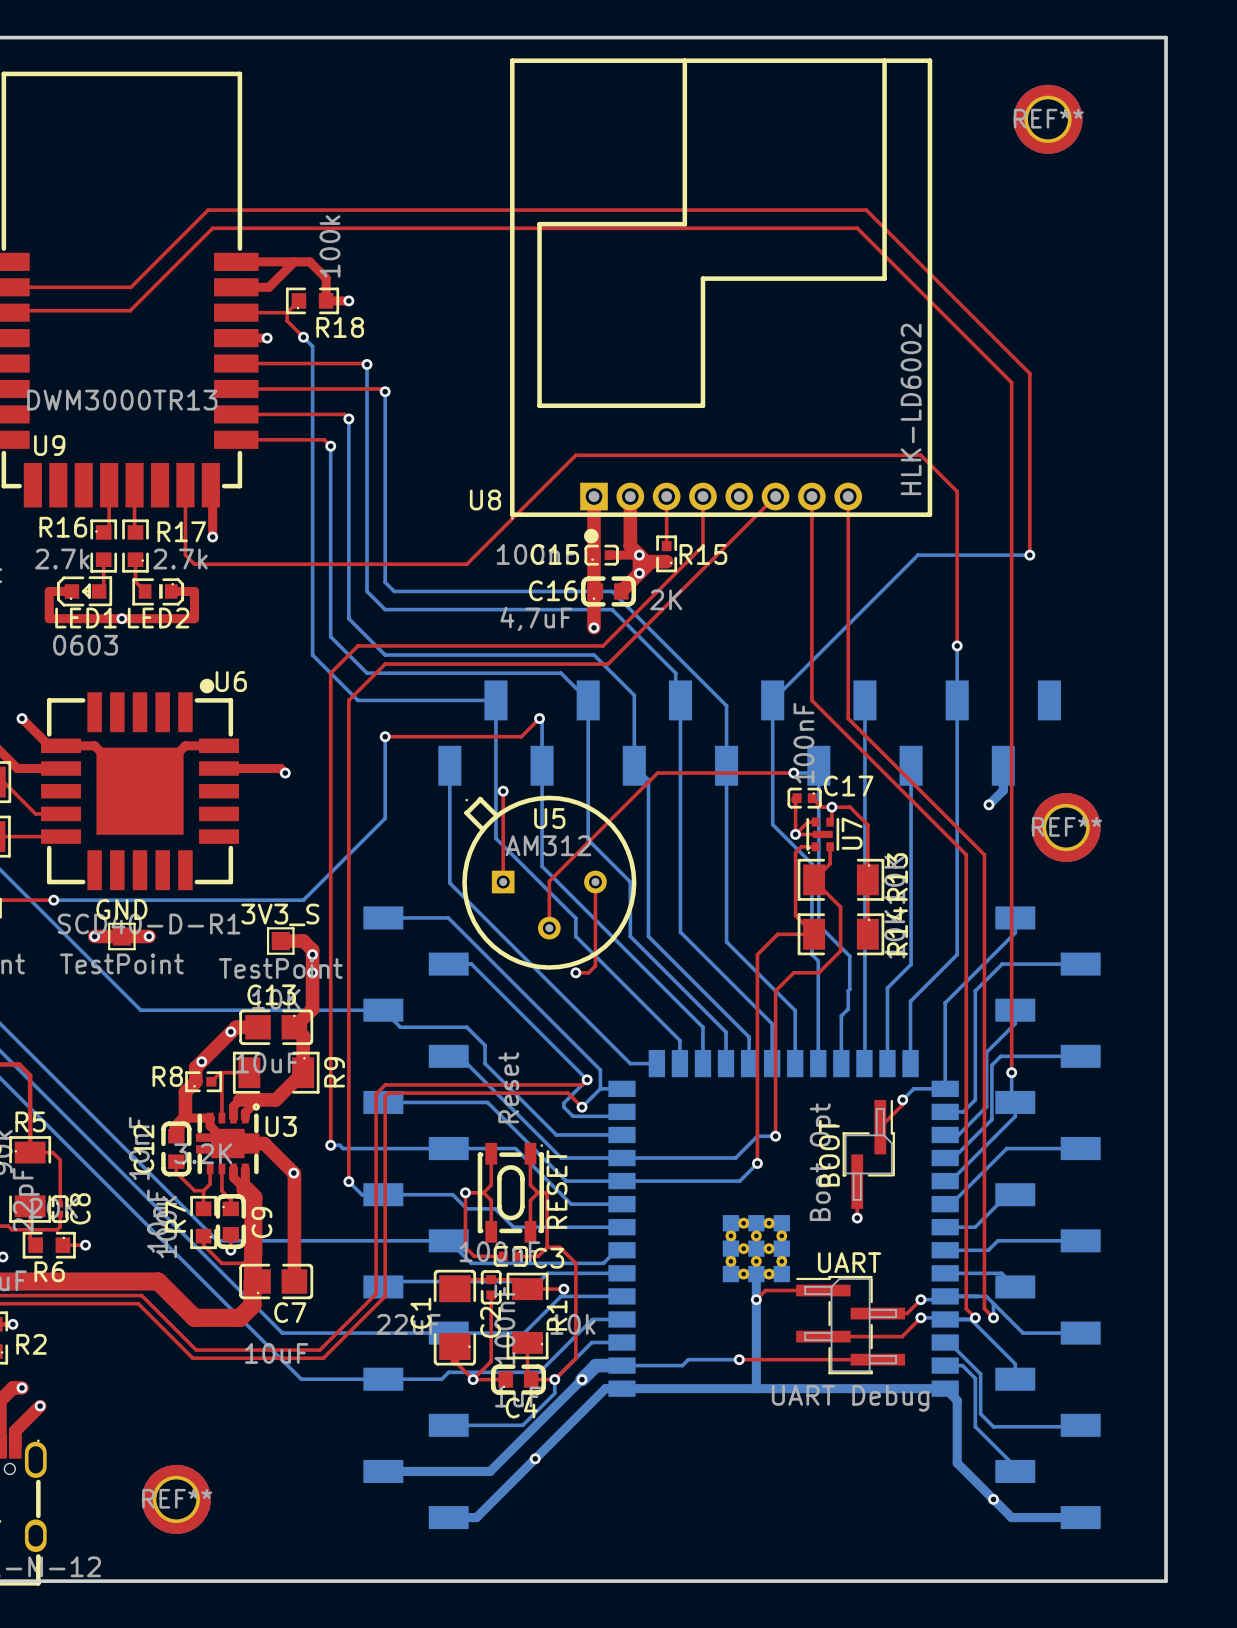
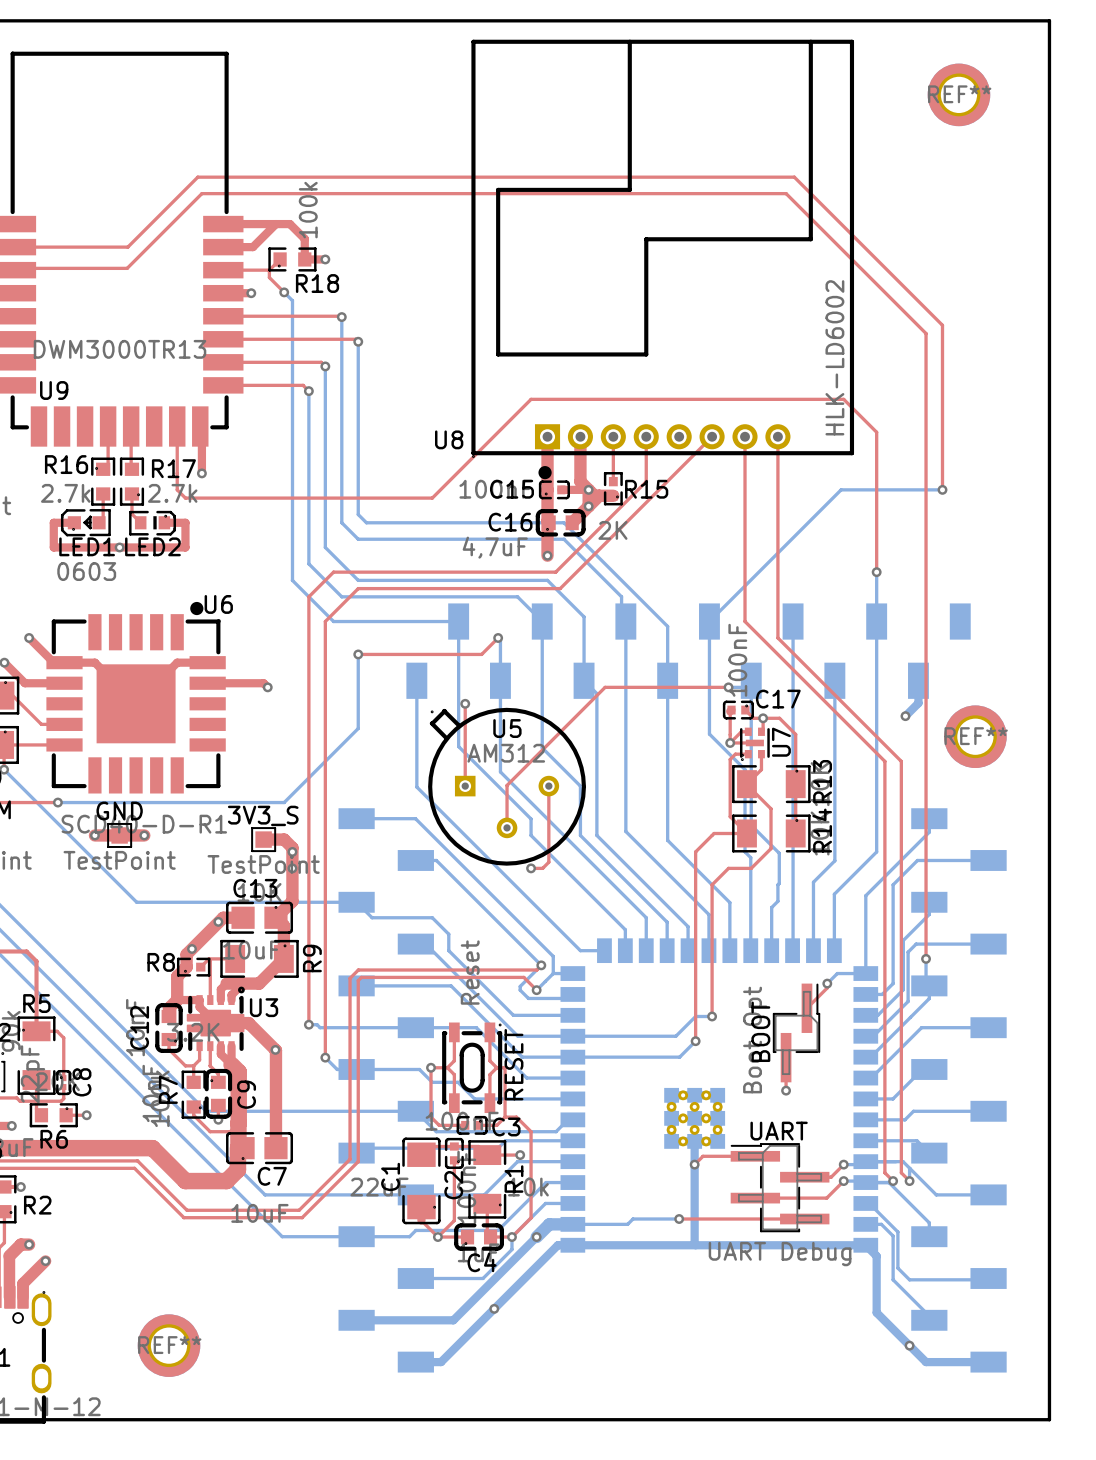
board edge: (1147, 37) (1166, 37) (1166, 1581) (1147, 1581) -> (1049, 20) (1049, 1419)

